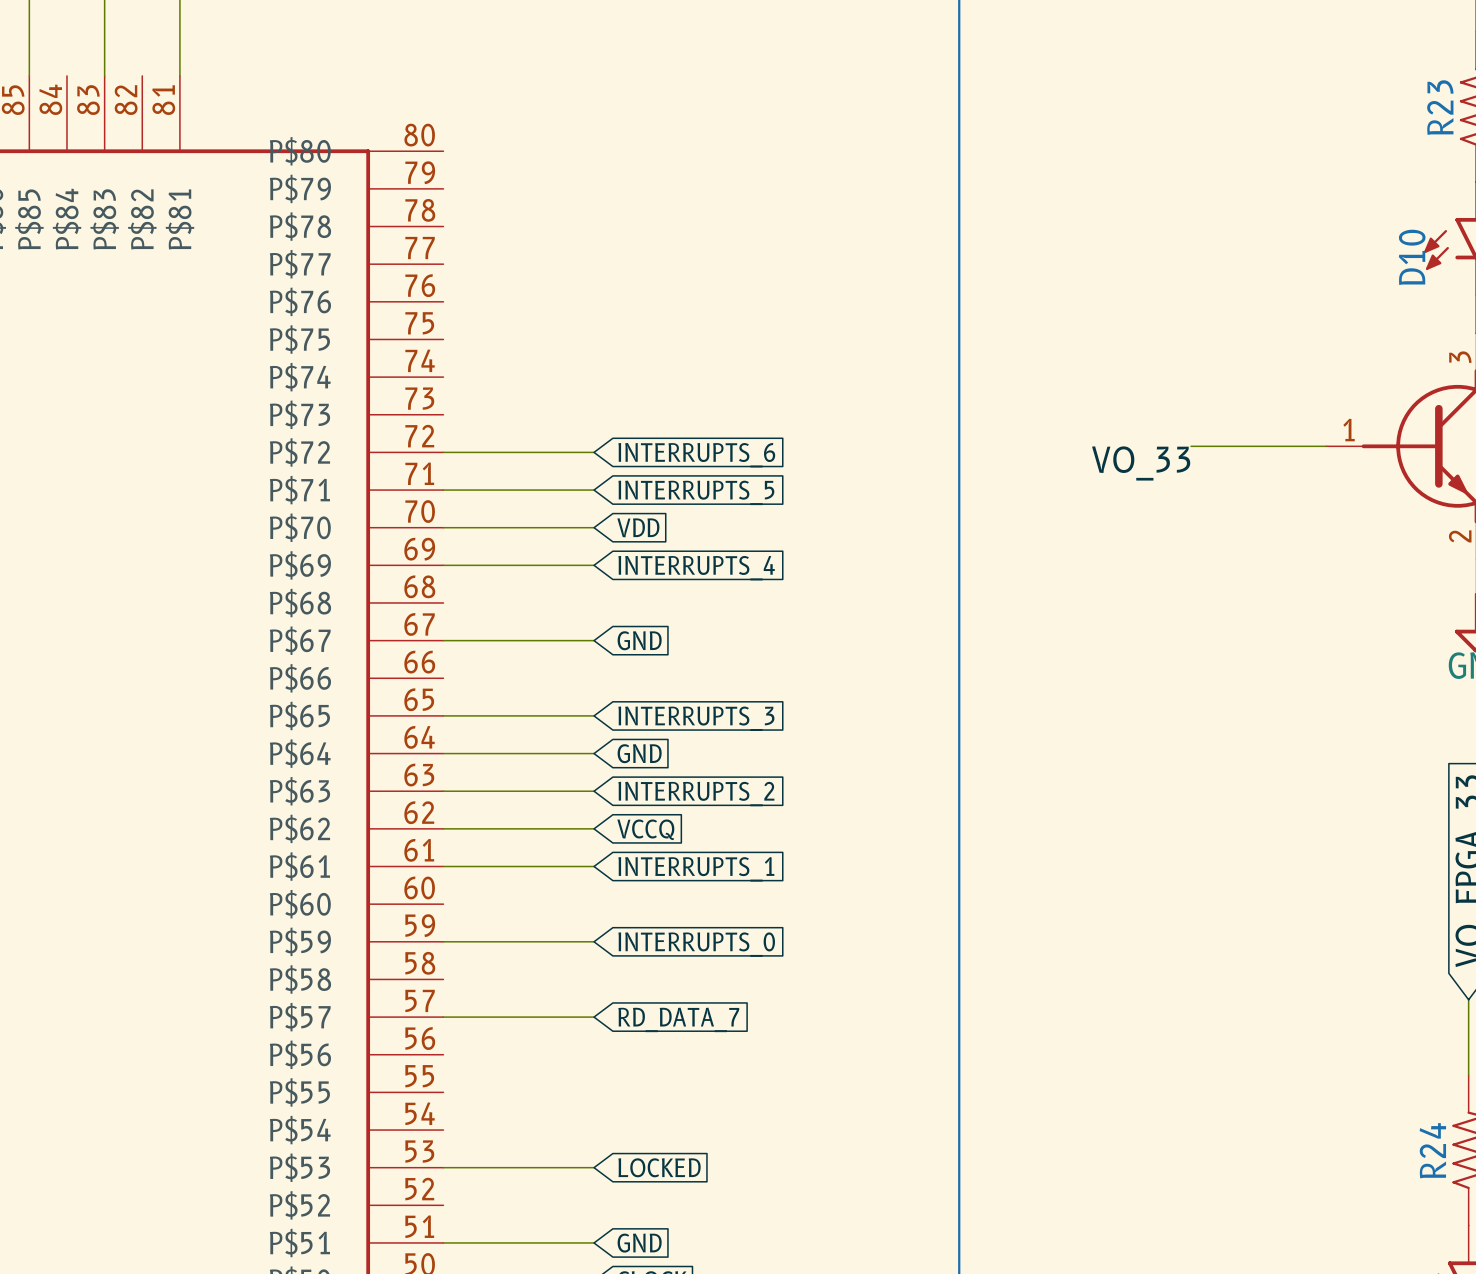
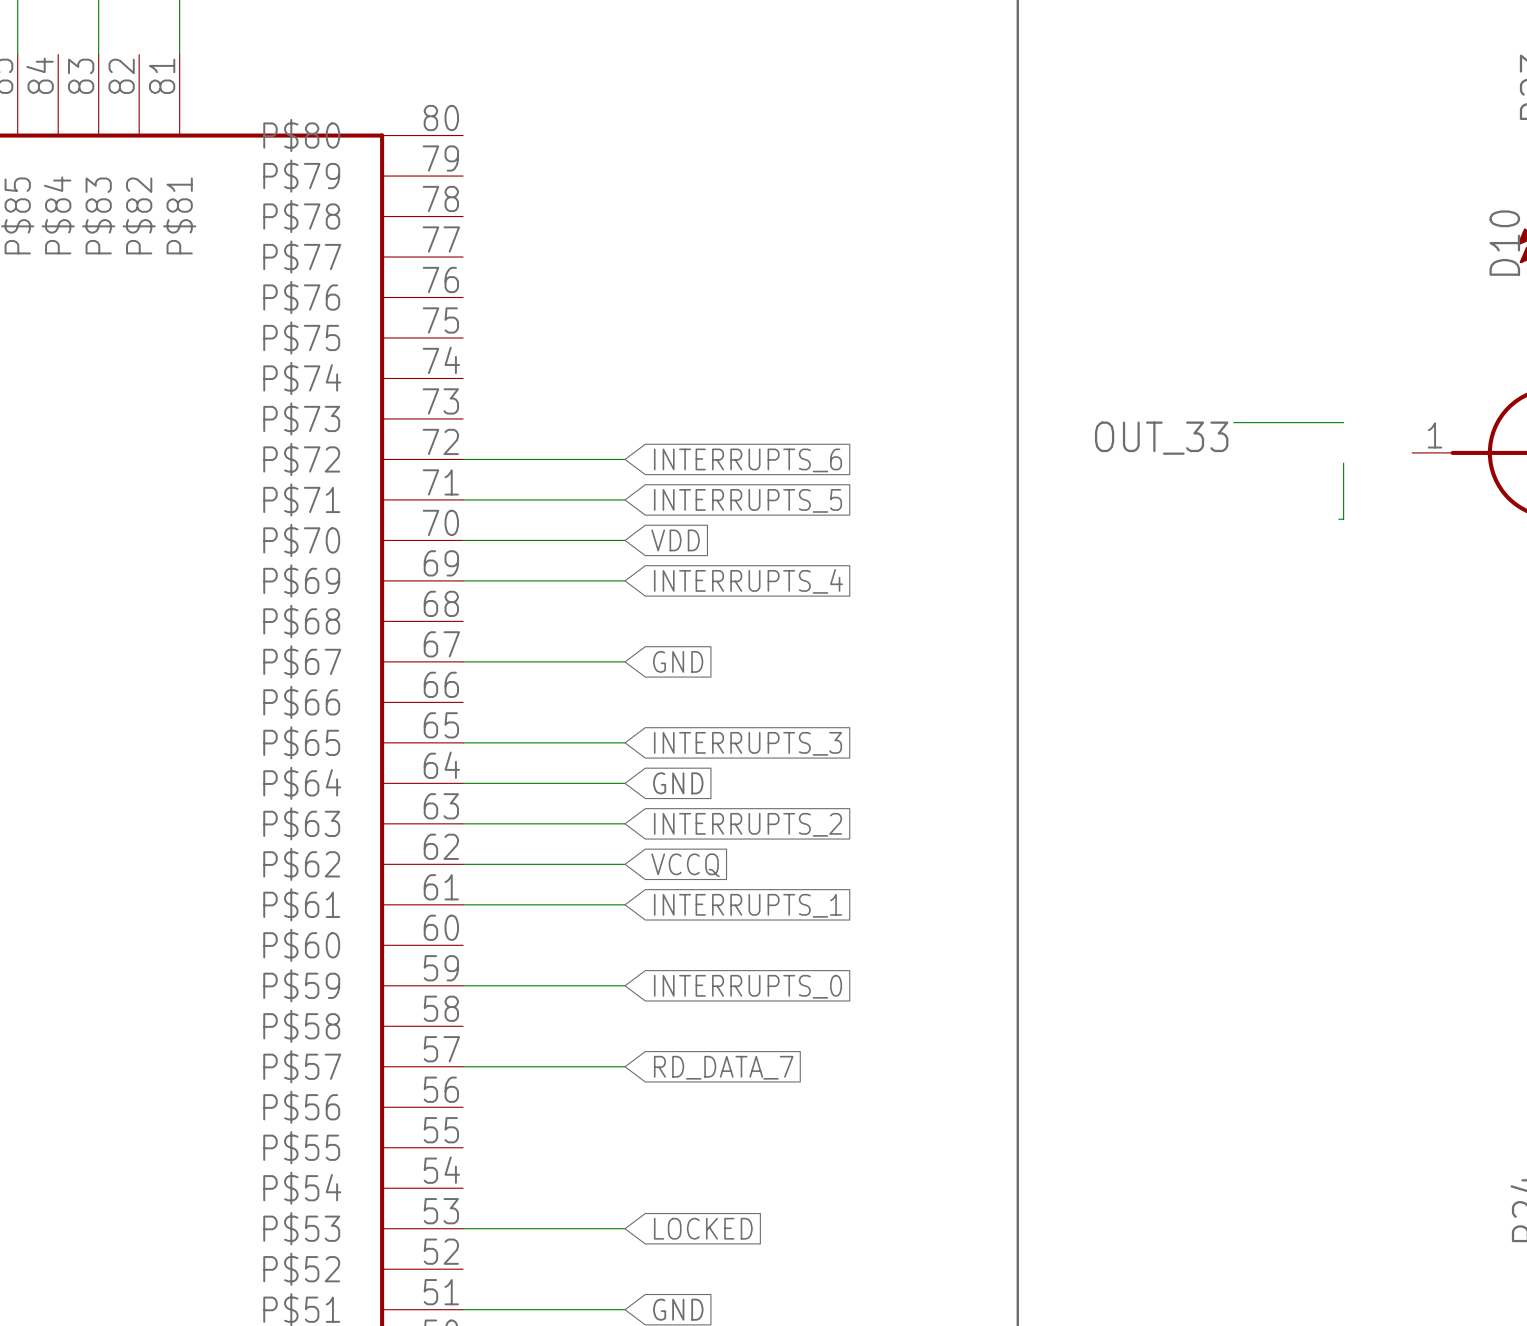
wire: none -> (1233, 422) (1343, 422)
wire: (1191, 446) (1325, 446) -> none
wire: none -> (1343, 463) (1343, 519) (1338, 519)
label: VO_33 (1141, 463) -> OUT_33 (1161, 438)

